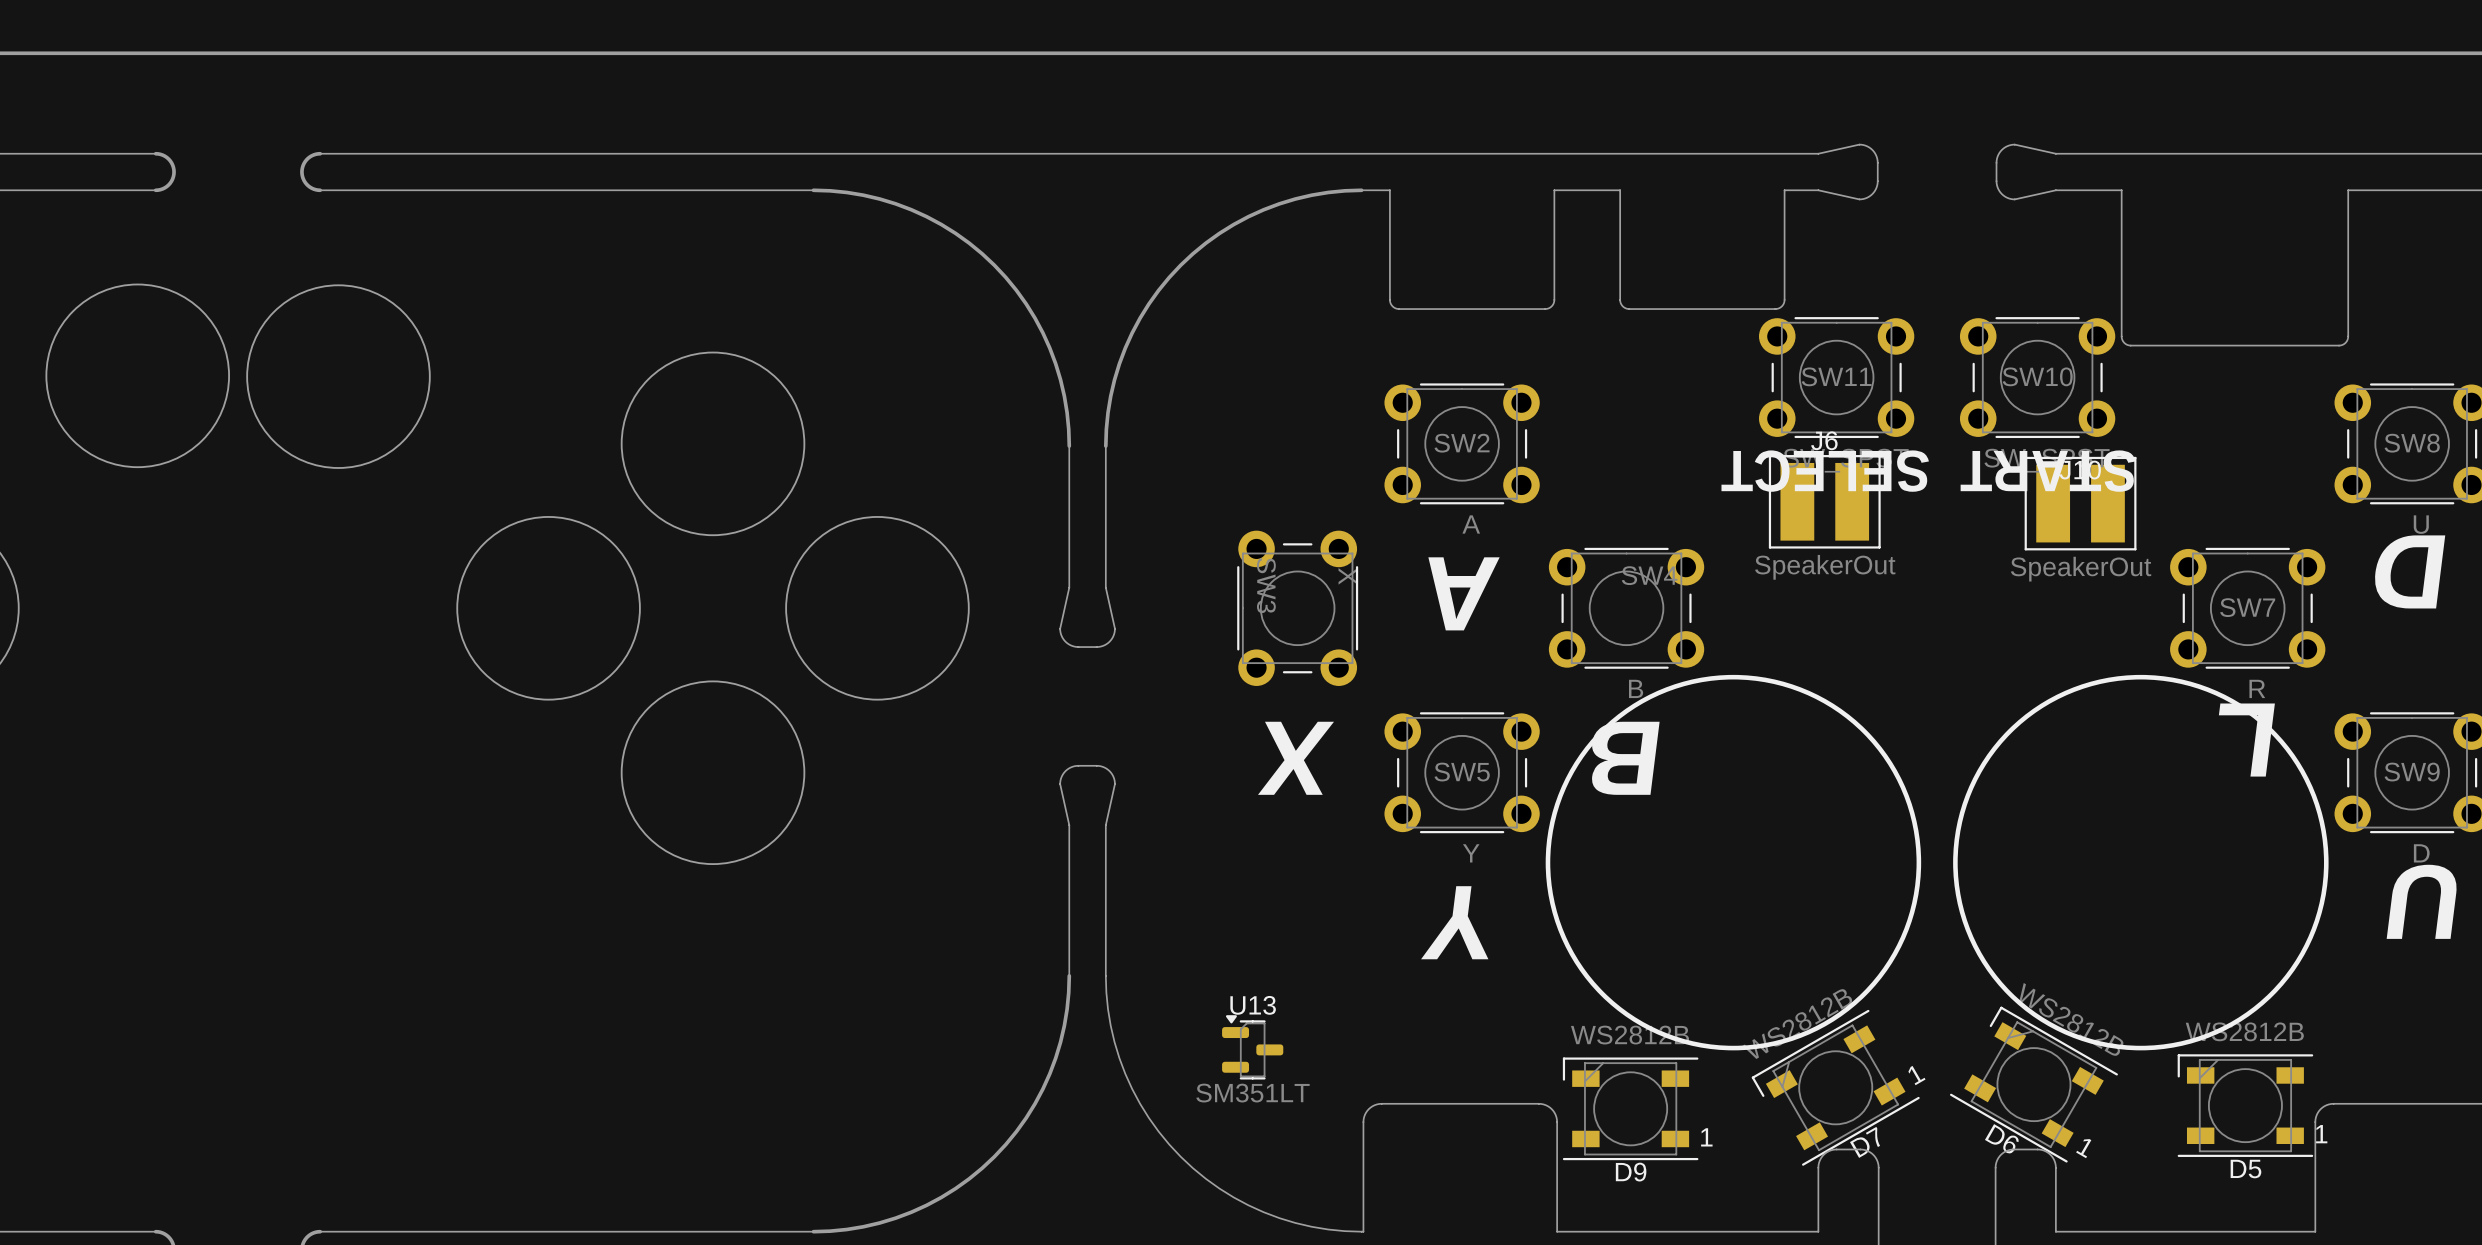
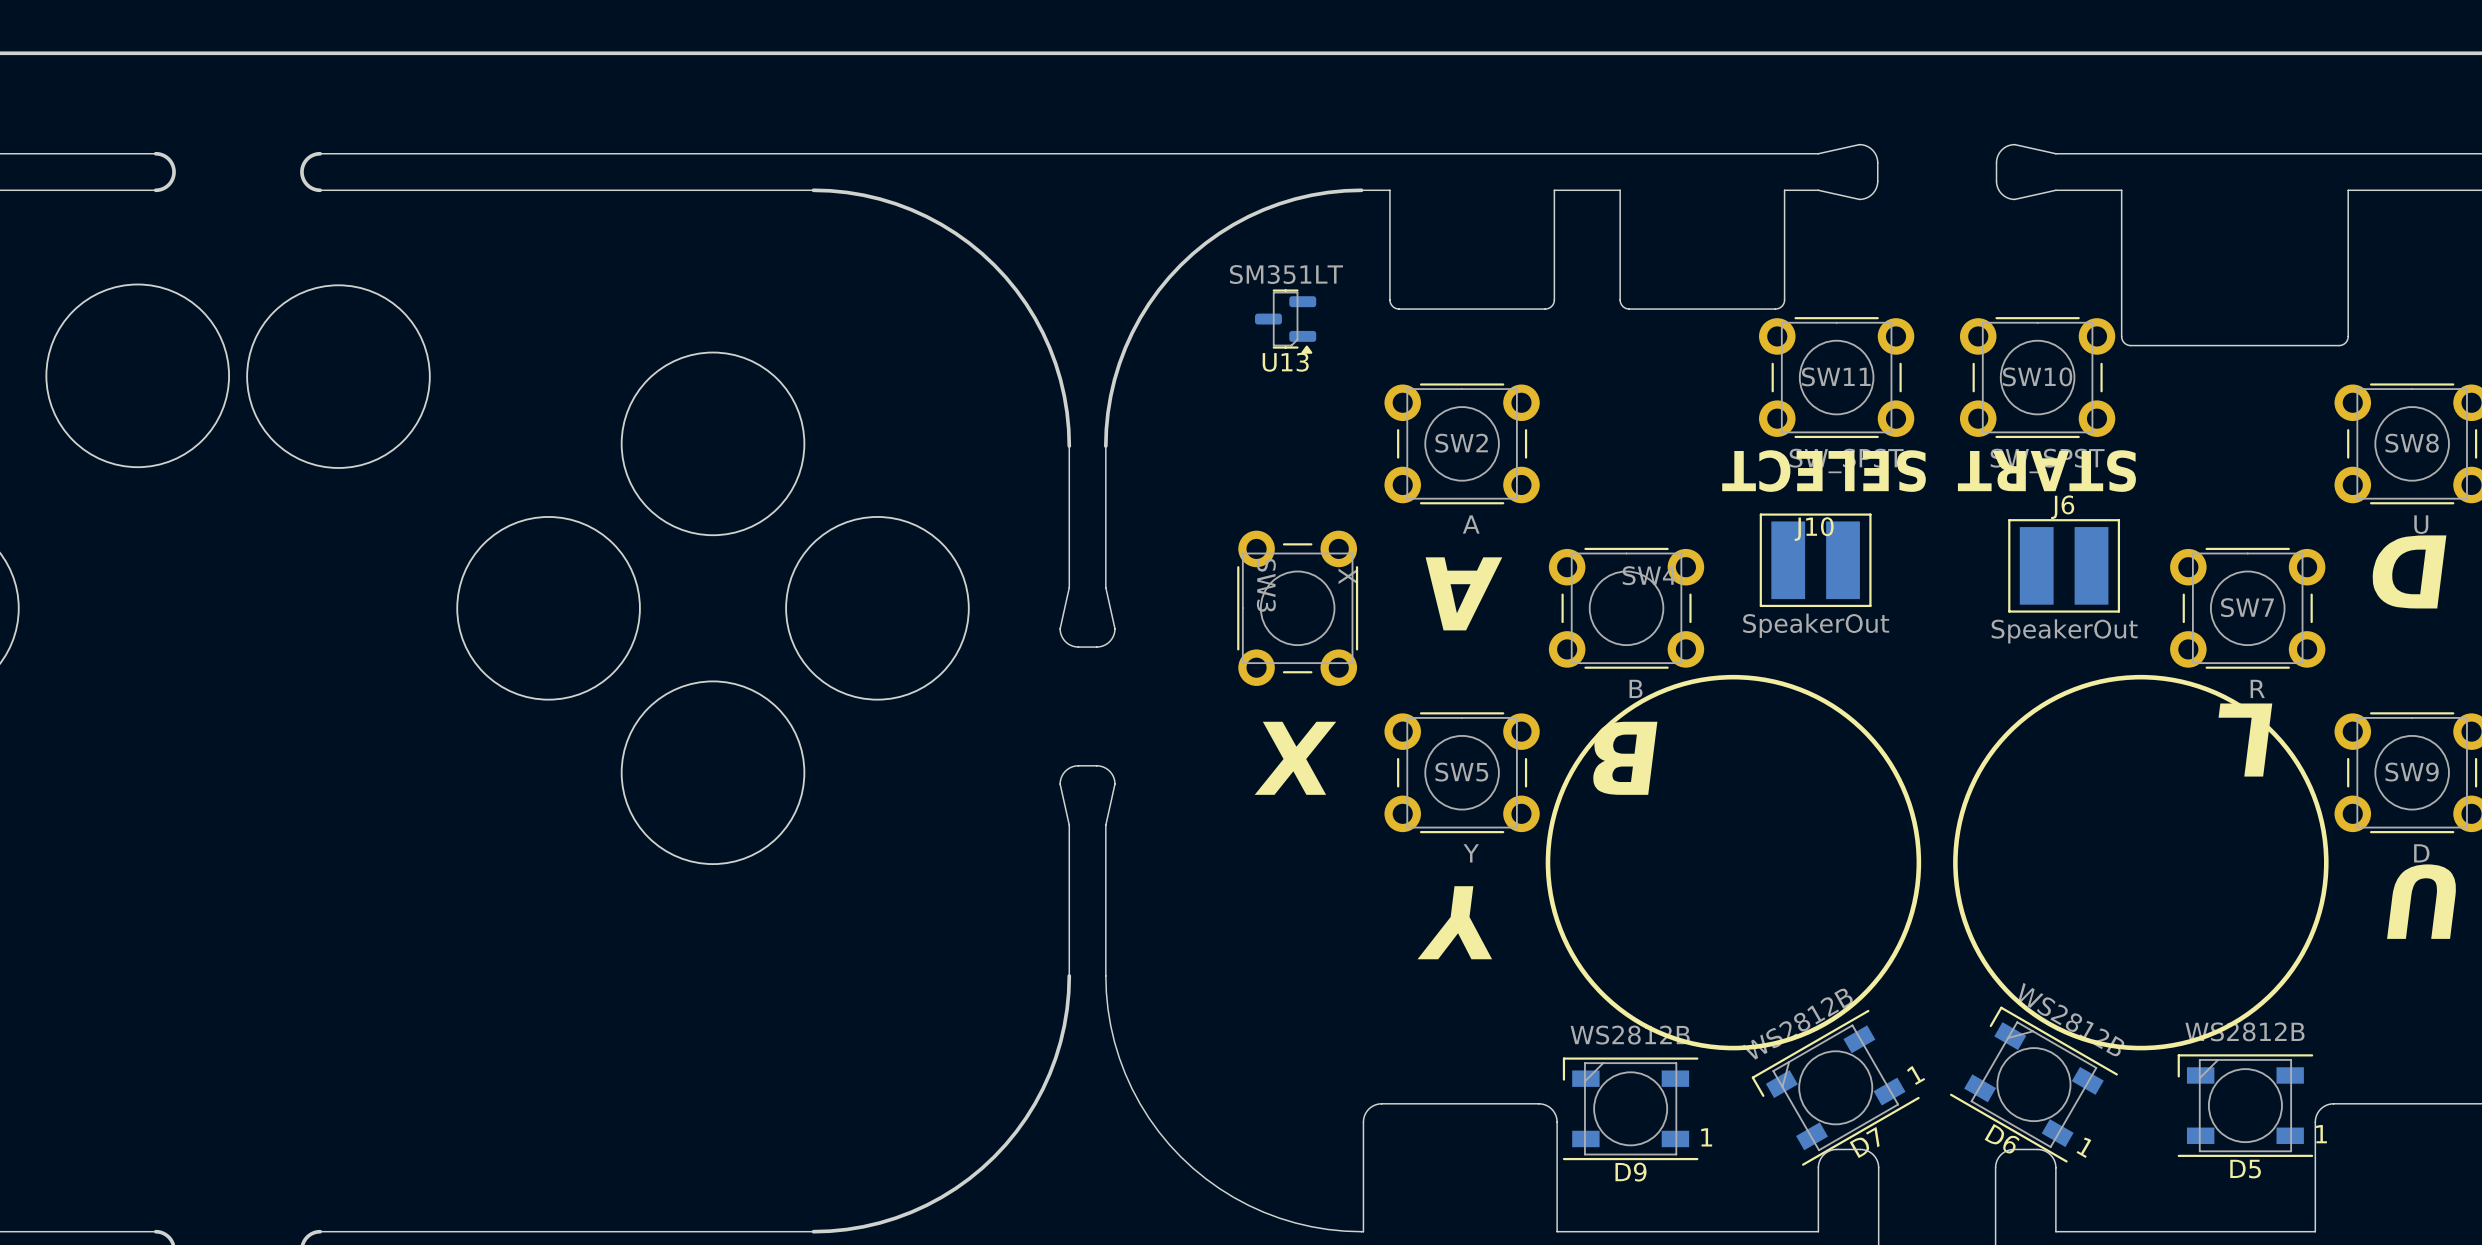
J6 position: (1824, 501) -> (2064, 565)
J10 position: (2080, 503) -> (1815, 560)
U13 rotation: 0° (1252, 1047) -> 180° (1285, 321)
U13 position: (1252, 1047) -> (1285, 321)

